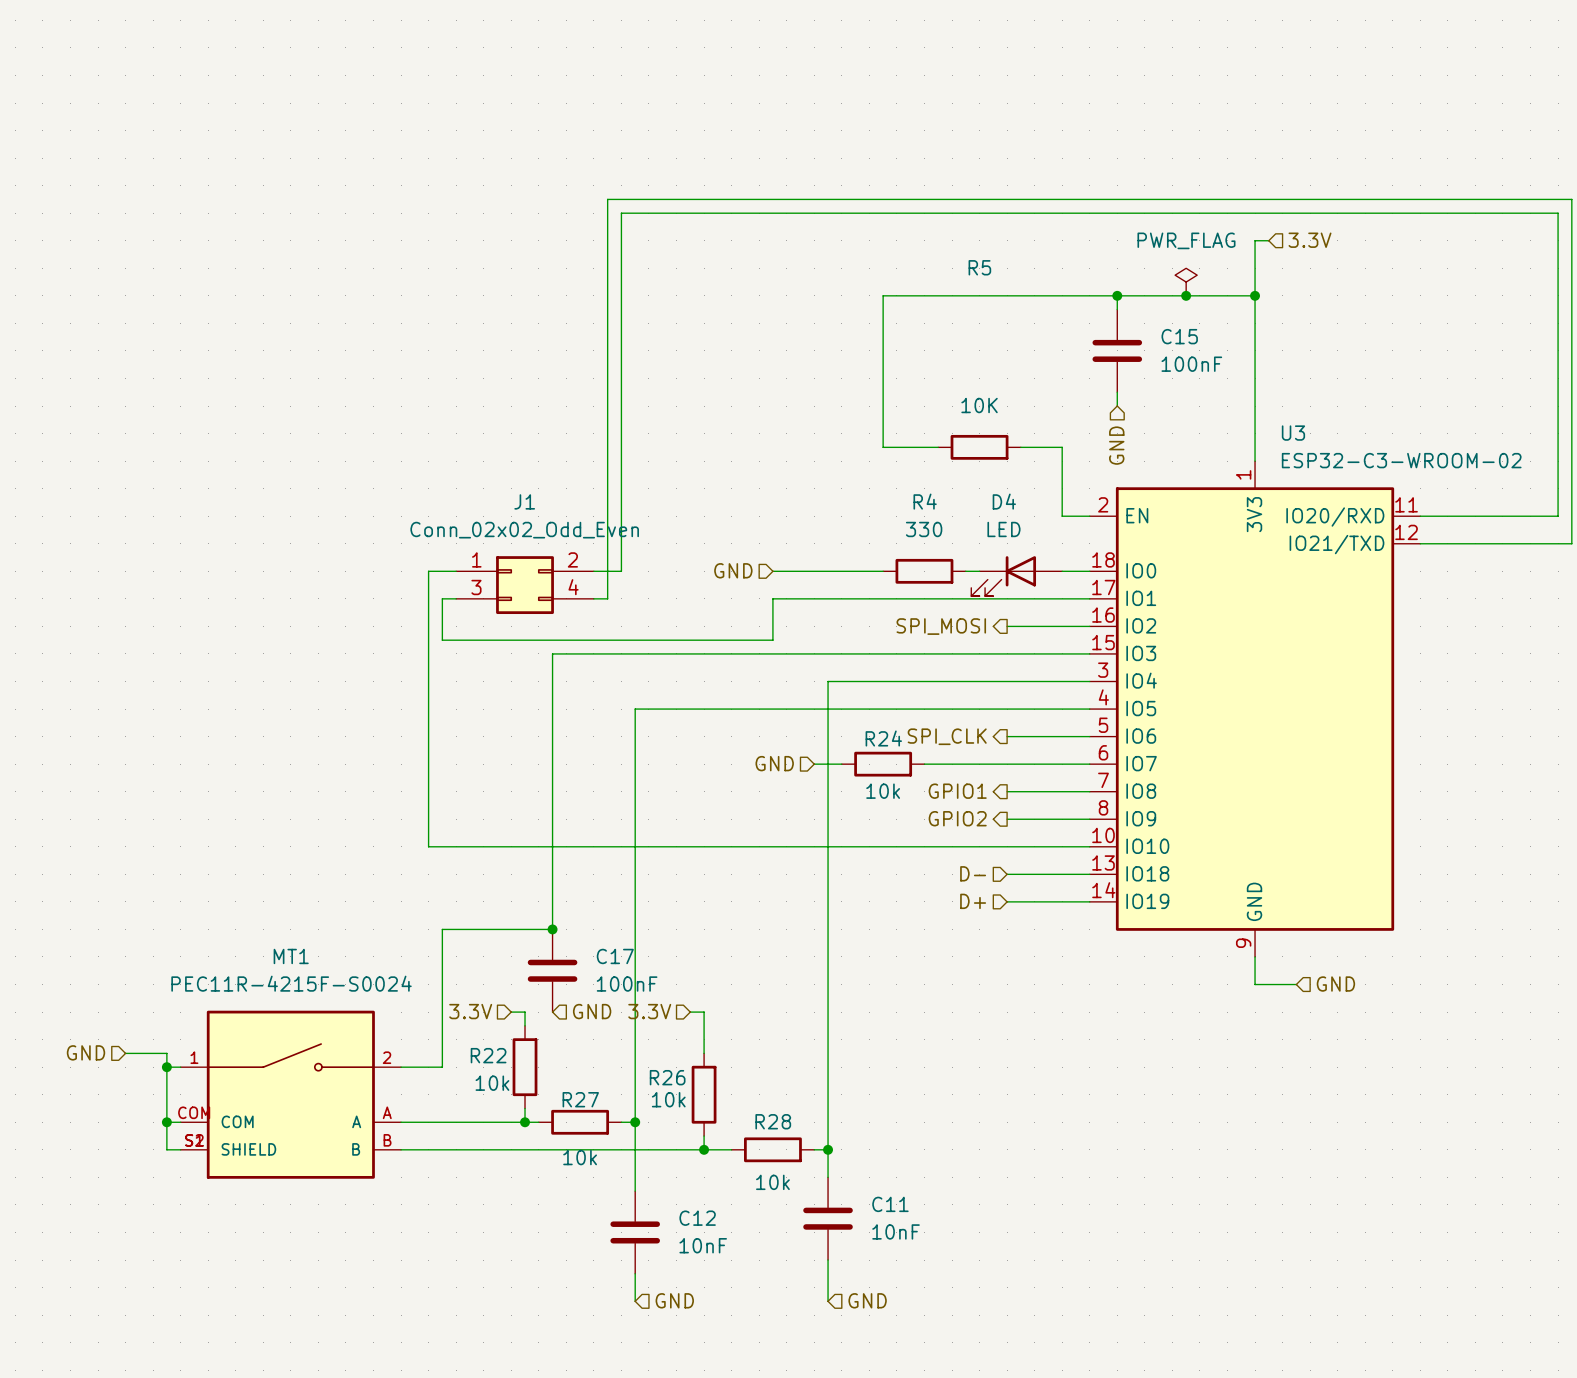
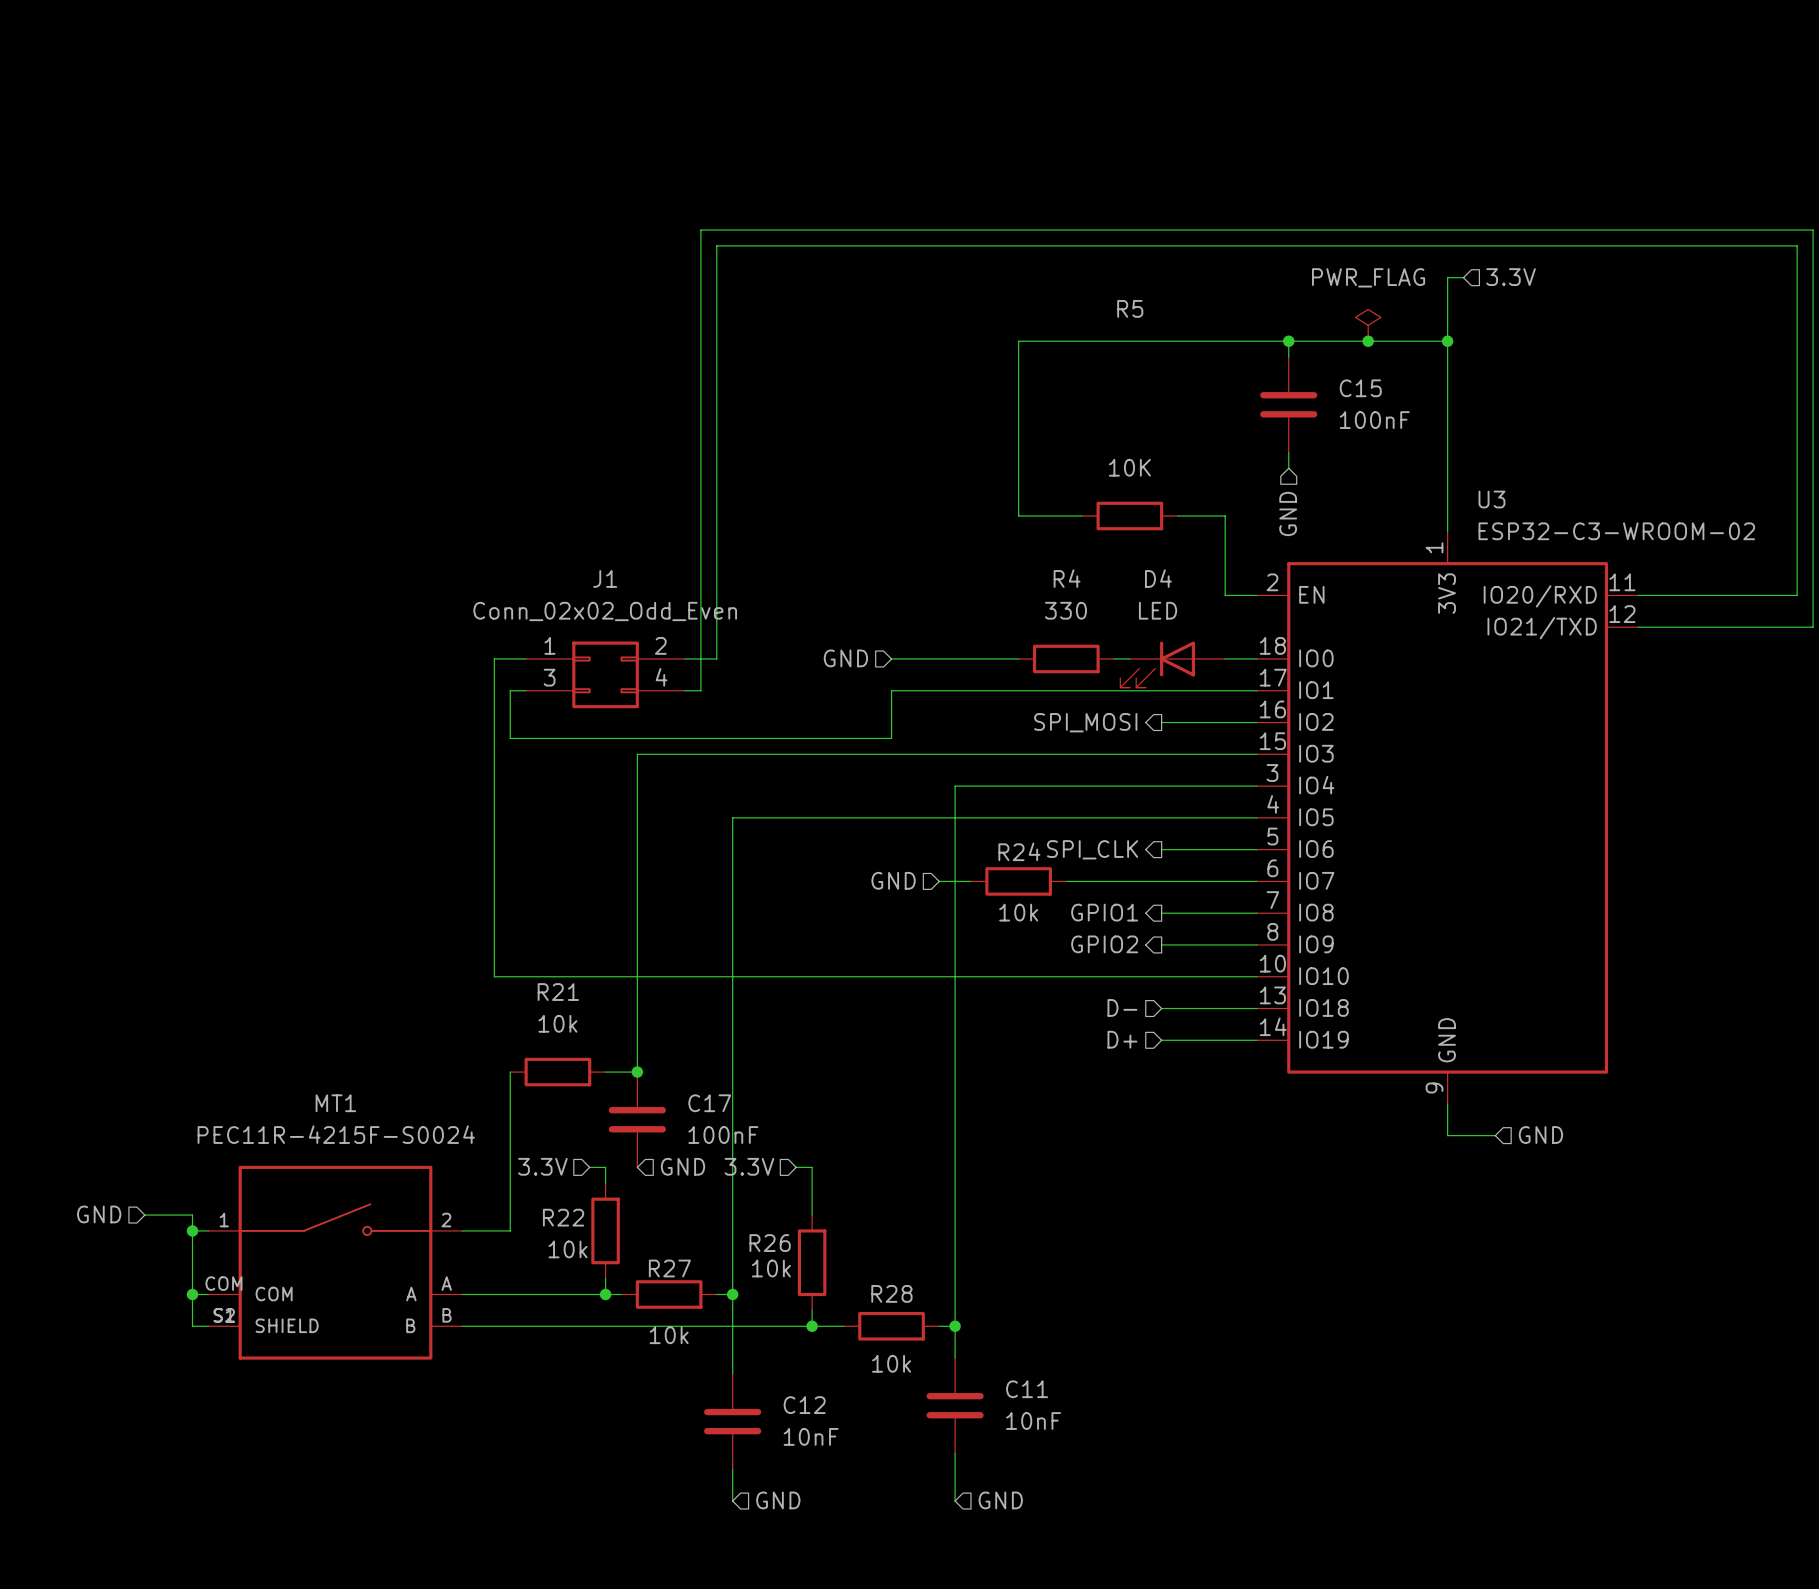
wire: (442, 929) (525, 929) -> none
R21: none -> 10k (557, 1072)

